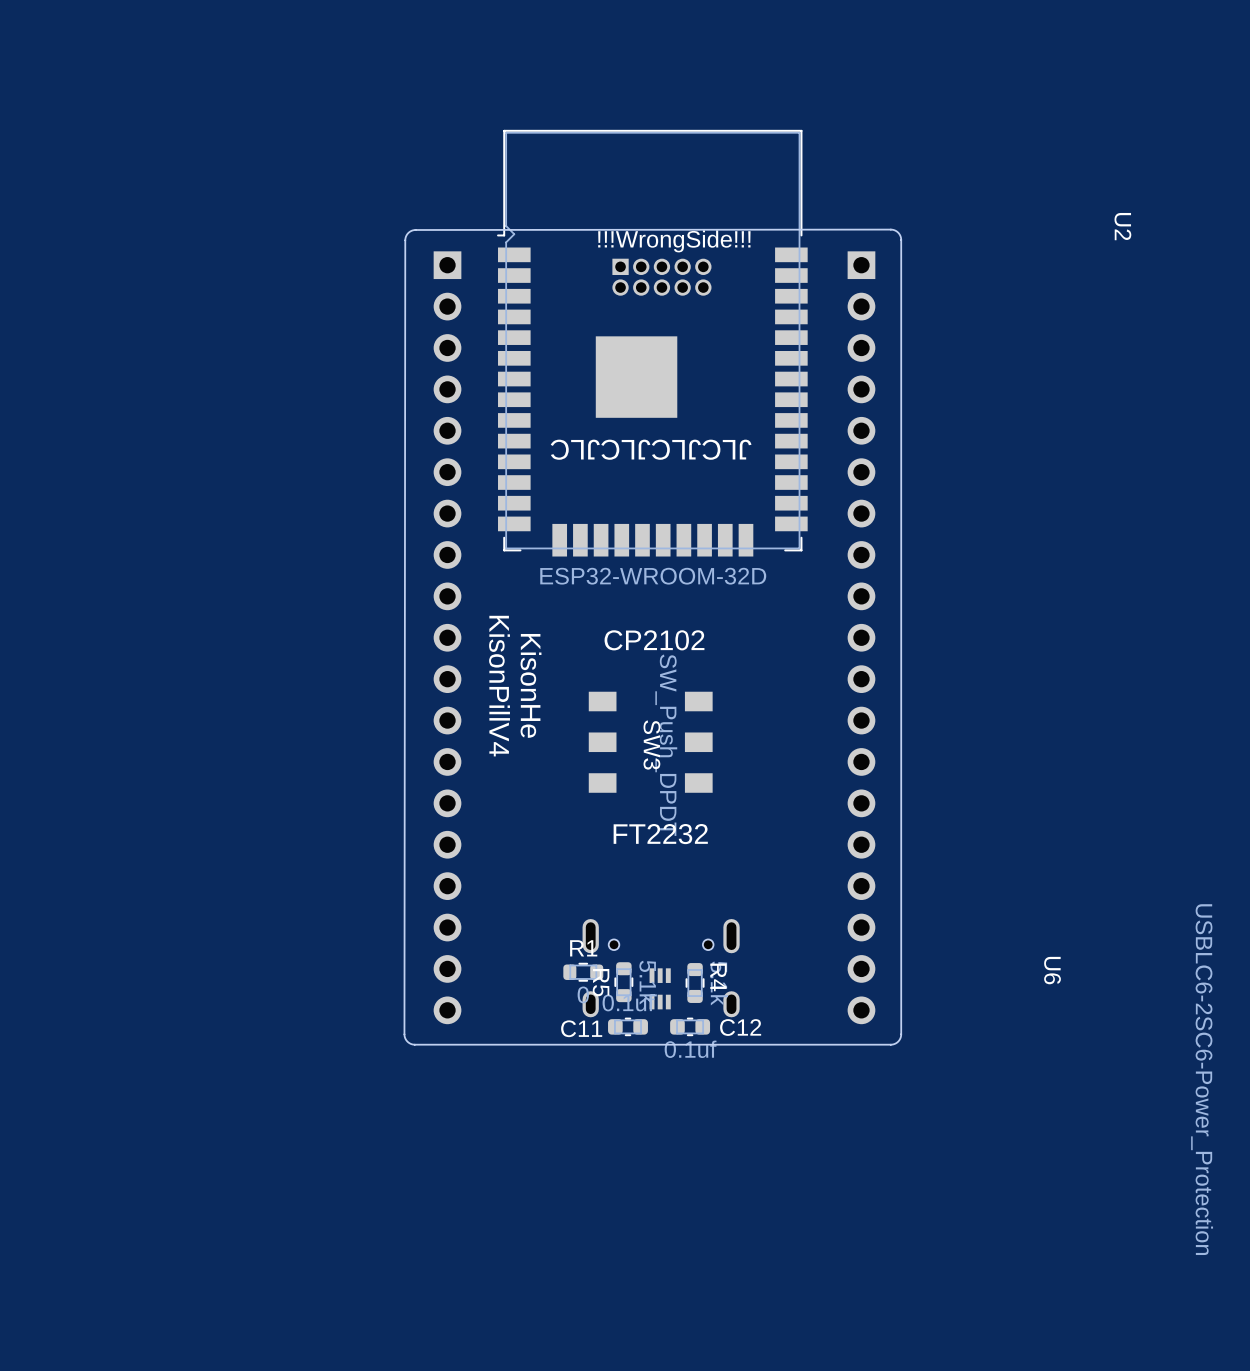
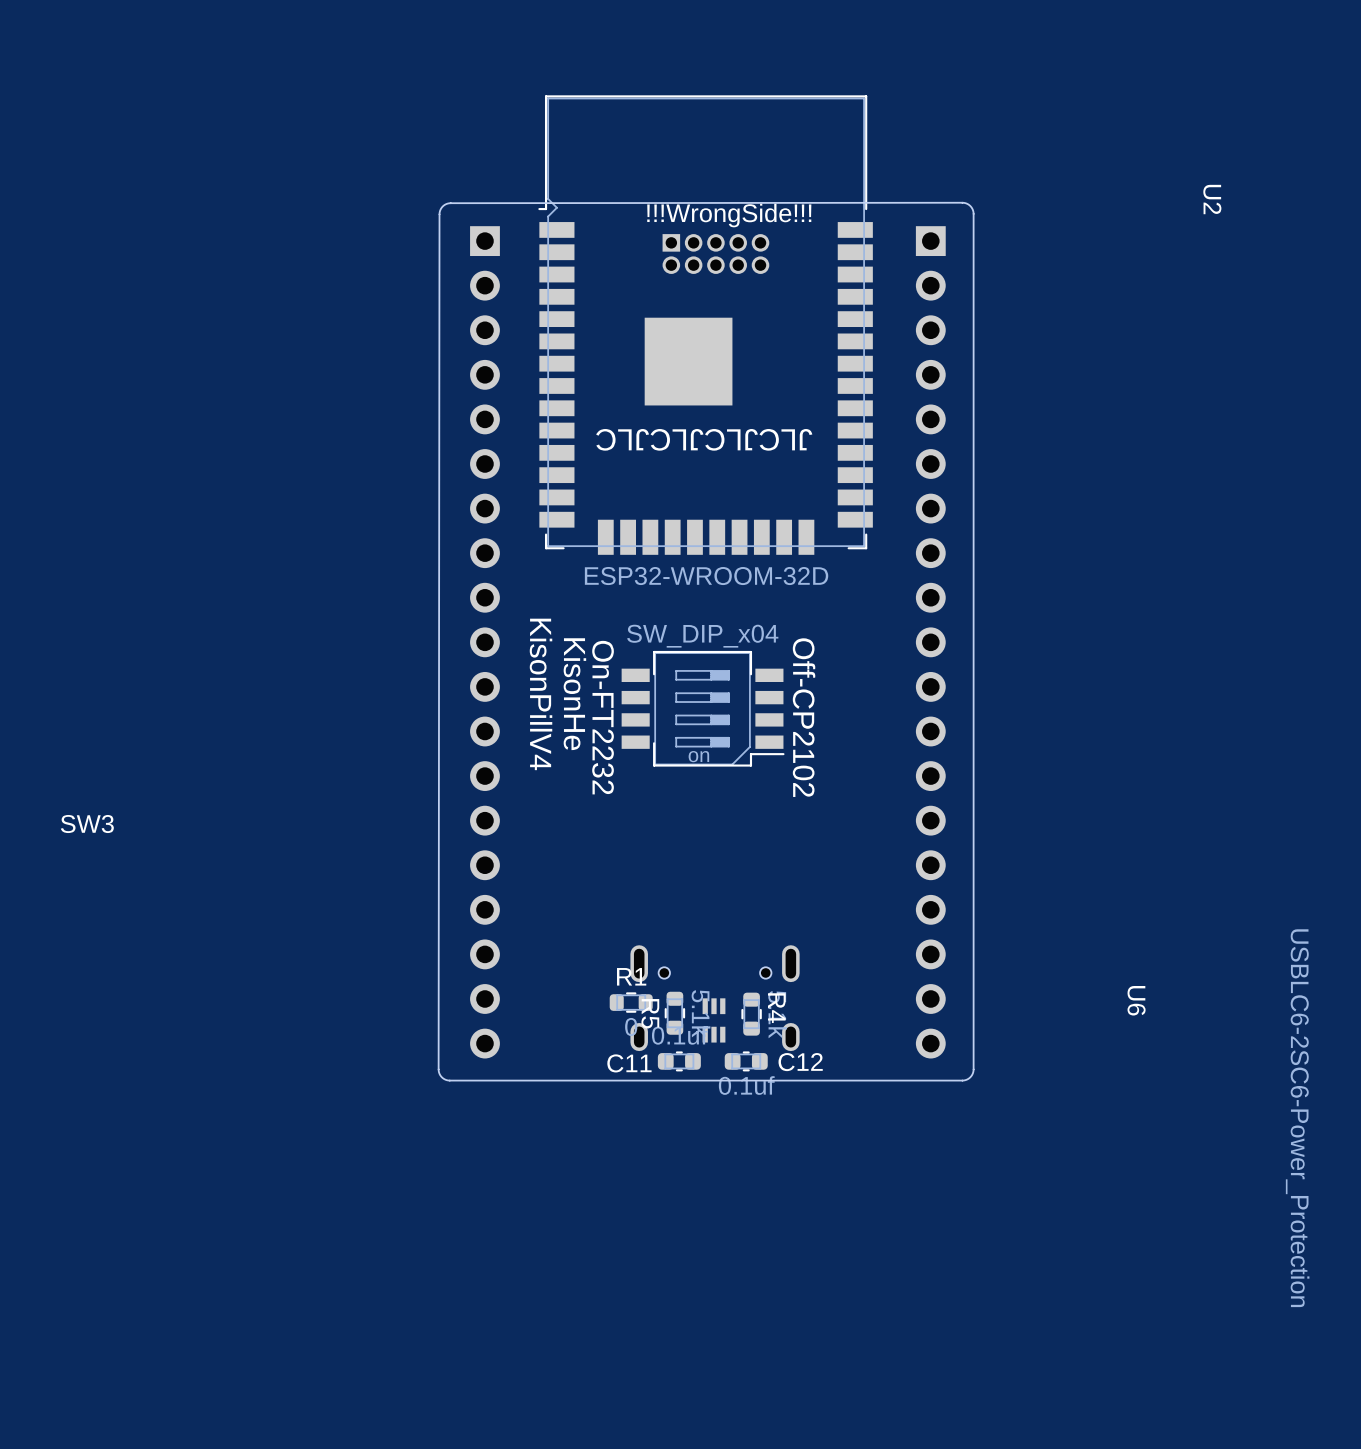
text: CP2102 (654, 640) -> none
SW3 footprint: [588, 691, 713, 793] -> [621, 650, 785, 767]
text: none -> On-FT2232 (603, 717)
text: none -> Off-CP2102 (804, 717)
SW3 name position: SW3 (651, 744) -> SW3 (87, 824)
SW3 value: SW_Push_DPDT (666, 745) -> SW_DIP_x04 (702, 636)
text: FT2232 (660, 834) -> none

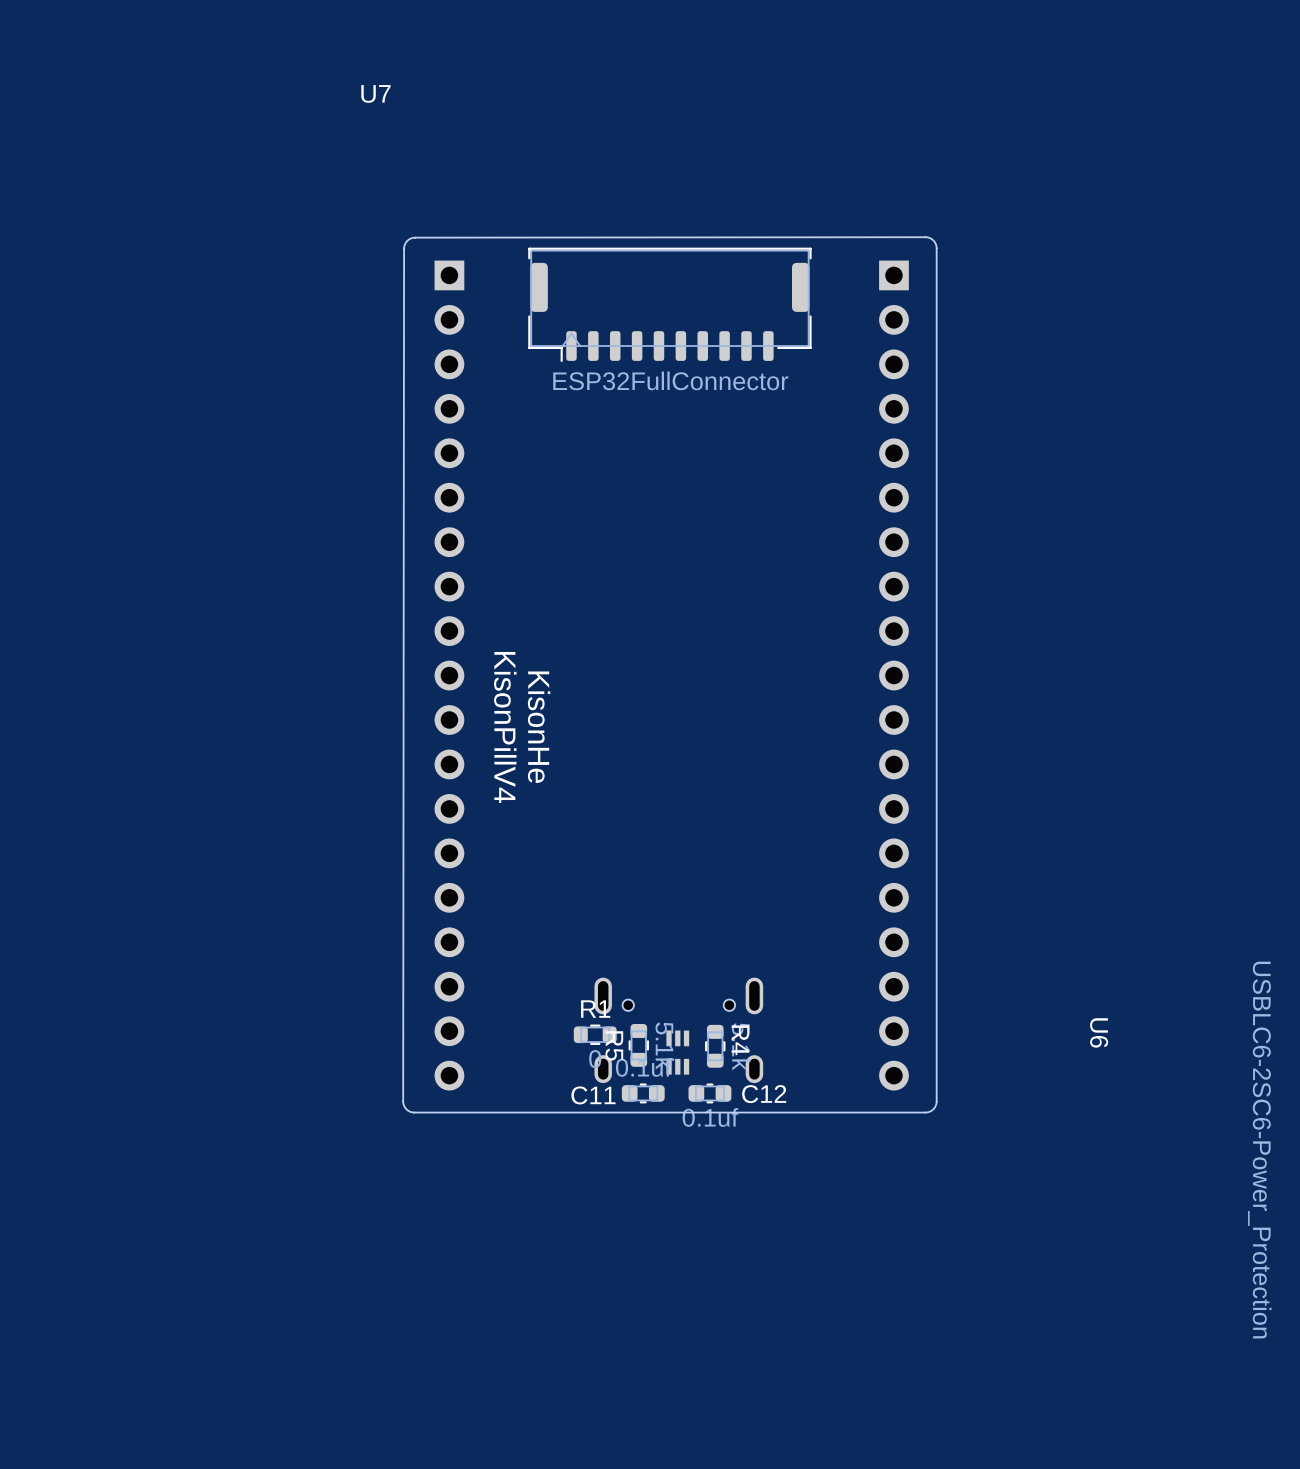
part: (715, 254) -> none
U7: none -> ESP32FullConnector (669, 304)
U2: ESP32-WROOM-32D (705, 325) -> none
text: JLCJLCJLCJLC (704, 439) -> none
SW3: SW_DIP_x04 (703, 708) -> none
text: On-FT2232 (603, 717) -> none
text: Off-CP2102 (804, 717) -> none

